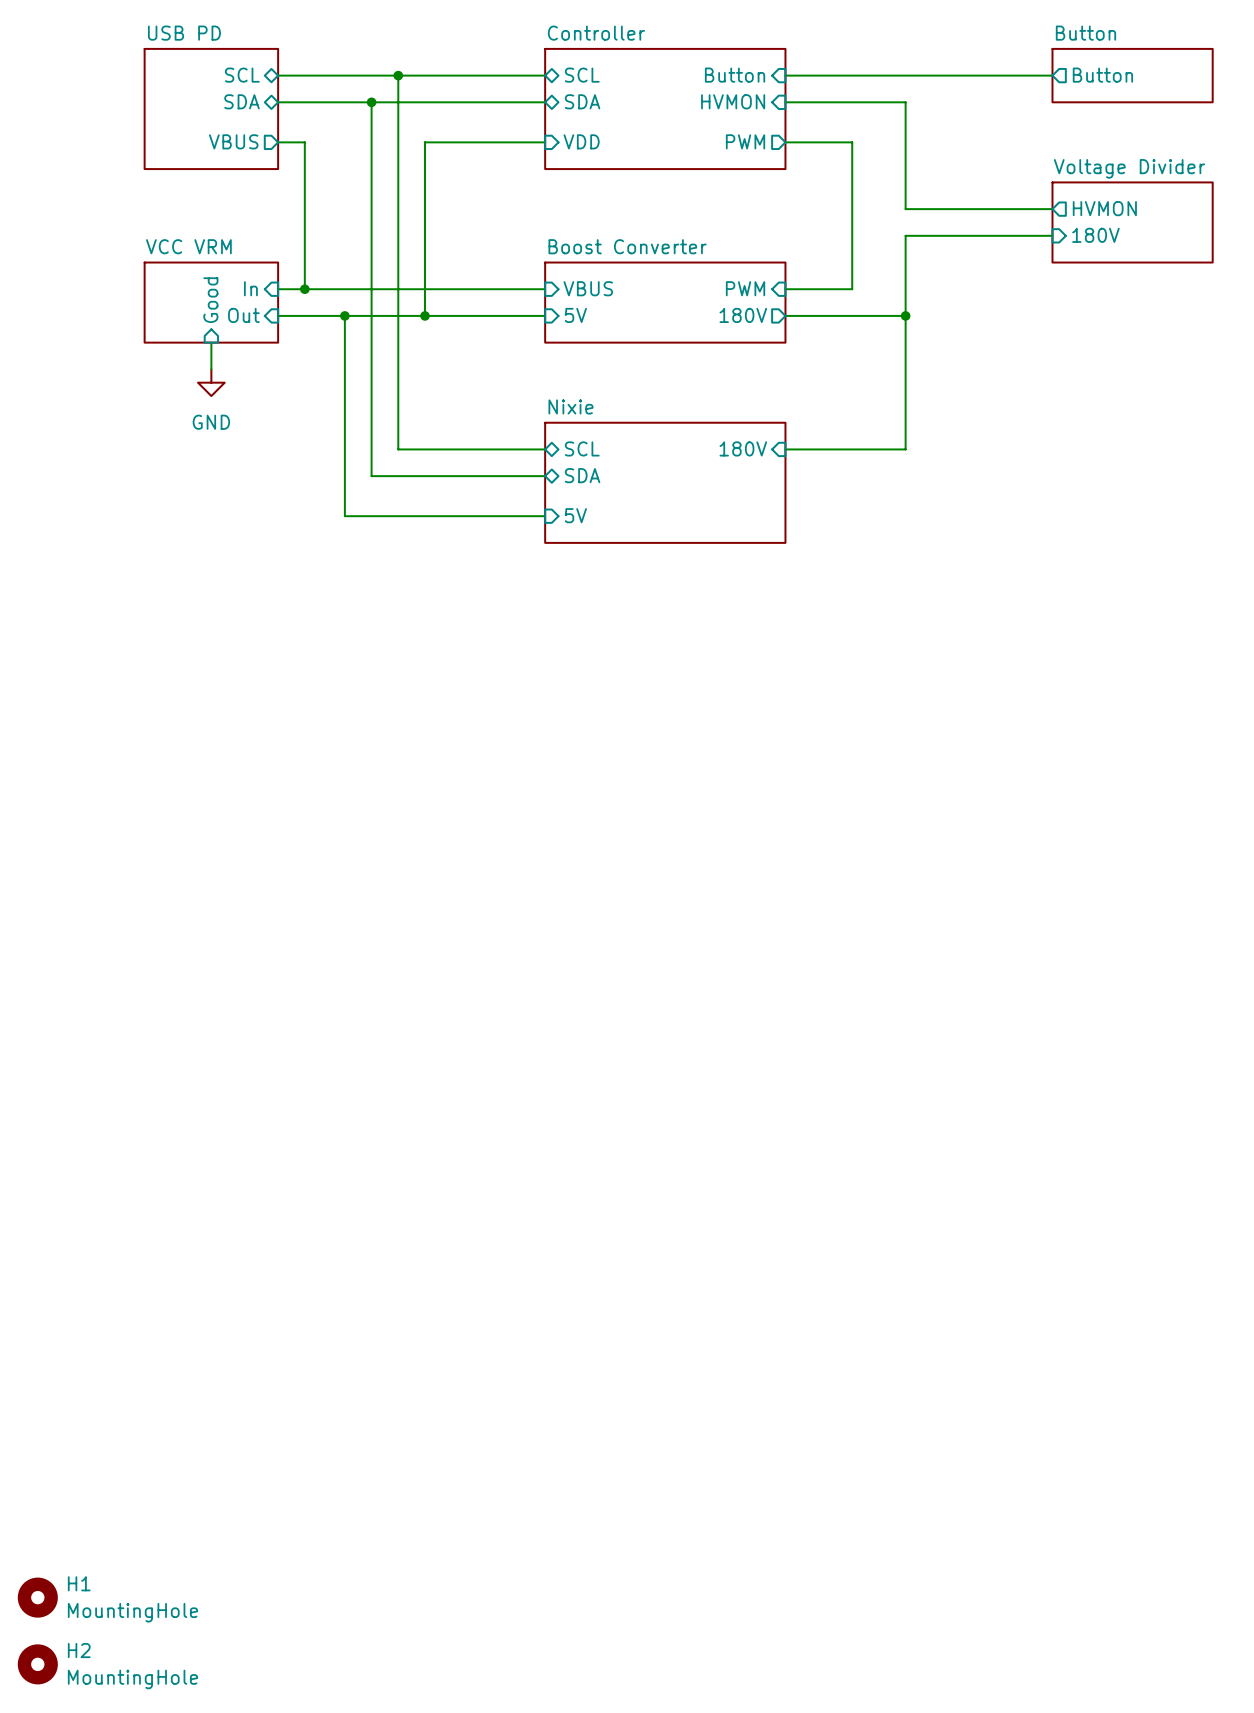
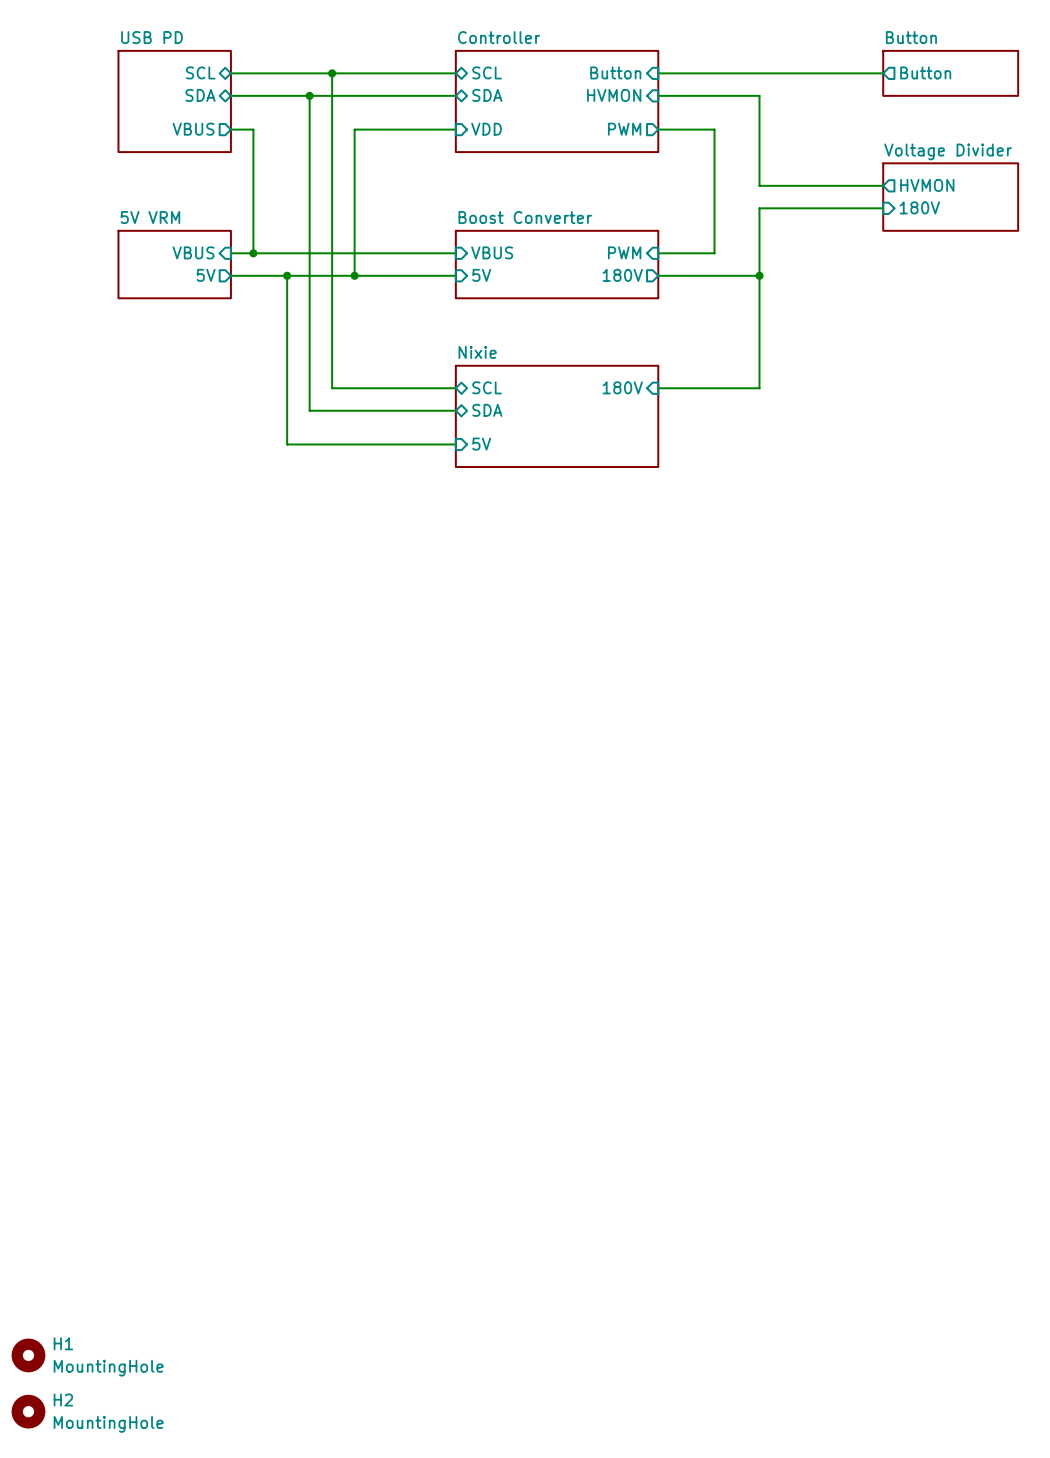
sheet VCC VRM name: VCC VRM (188, 246) -> 5V VRM (150, 217)
sheet pin: In (250, 288) -> VBUS (193, 252)
sheet pin: Good (210, 300) -> none
sheet pin shape: input (243, 315) -> output (206, 275)
sheet pin: Out (243, 315) -> 5V (206, 275)
wire: (211, 342) (211, 369) -> none
power symbol: GND (211, 382) -> none

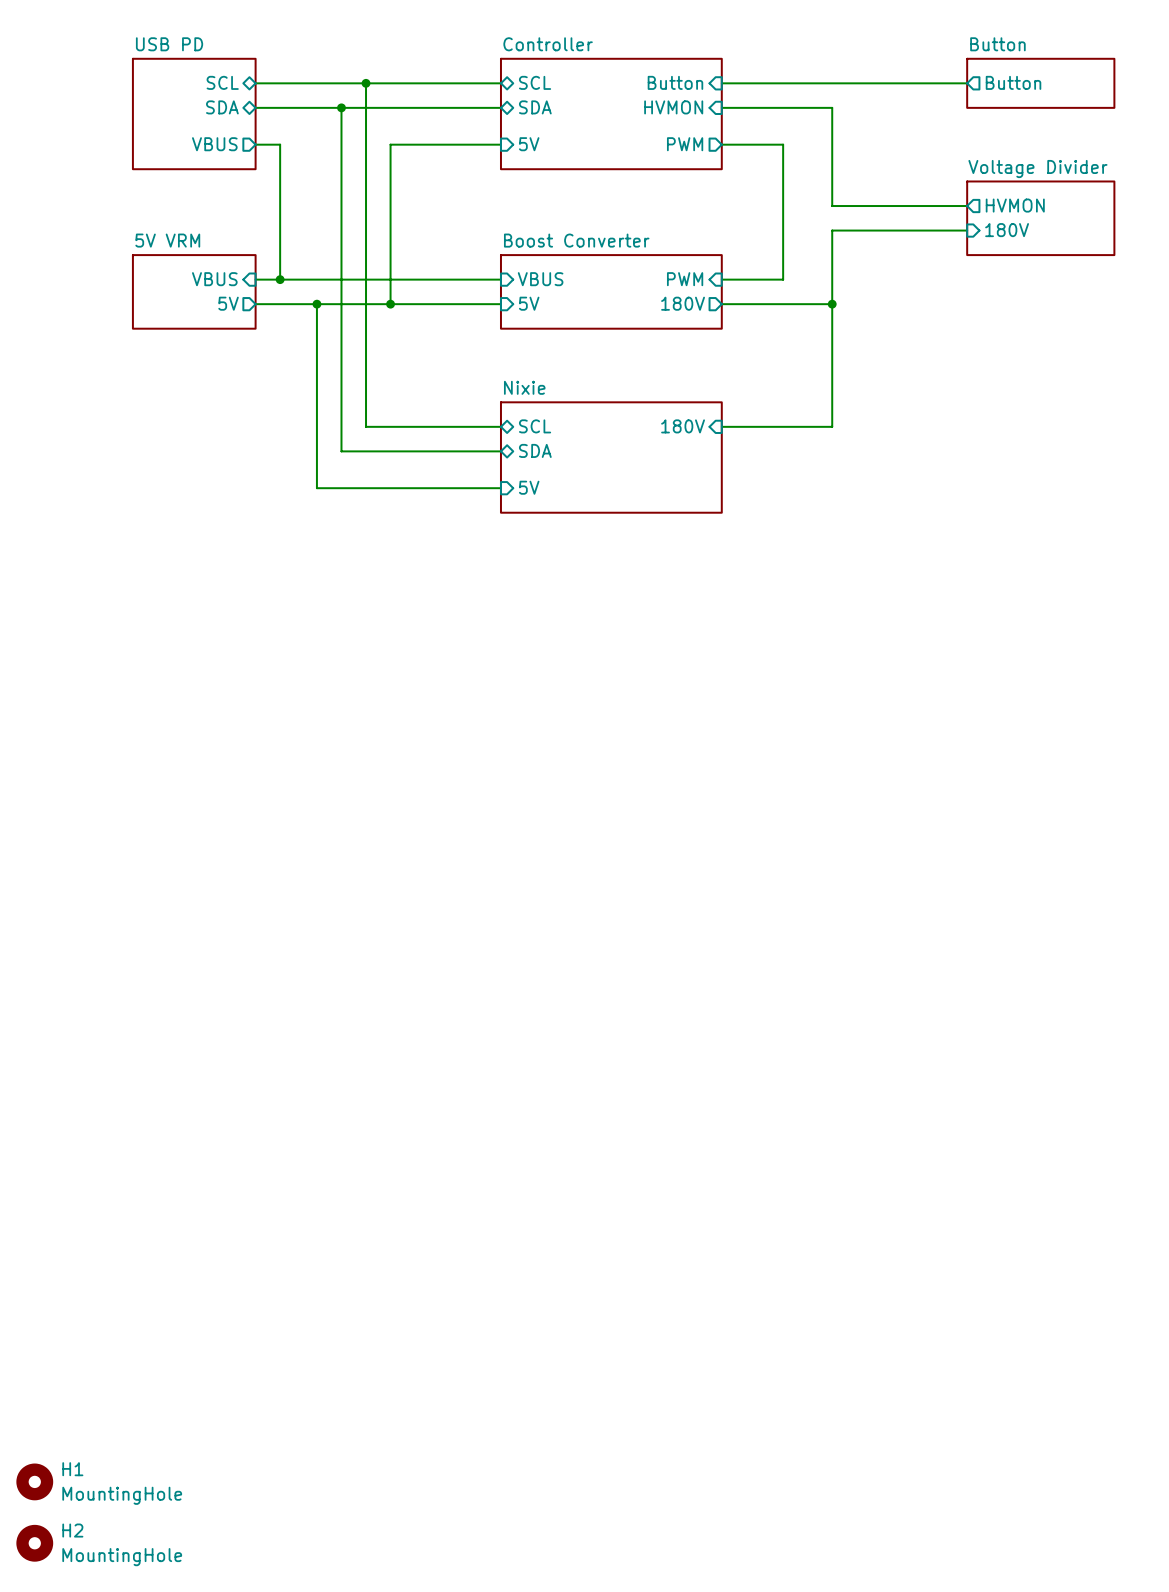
sheet pin: VDD (486, 129) -> 5V (529, 144)

